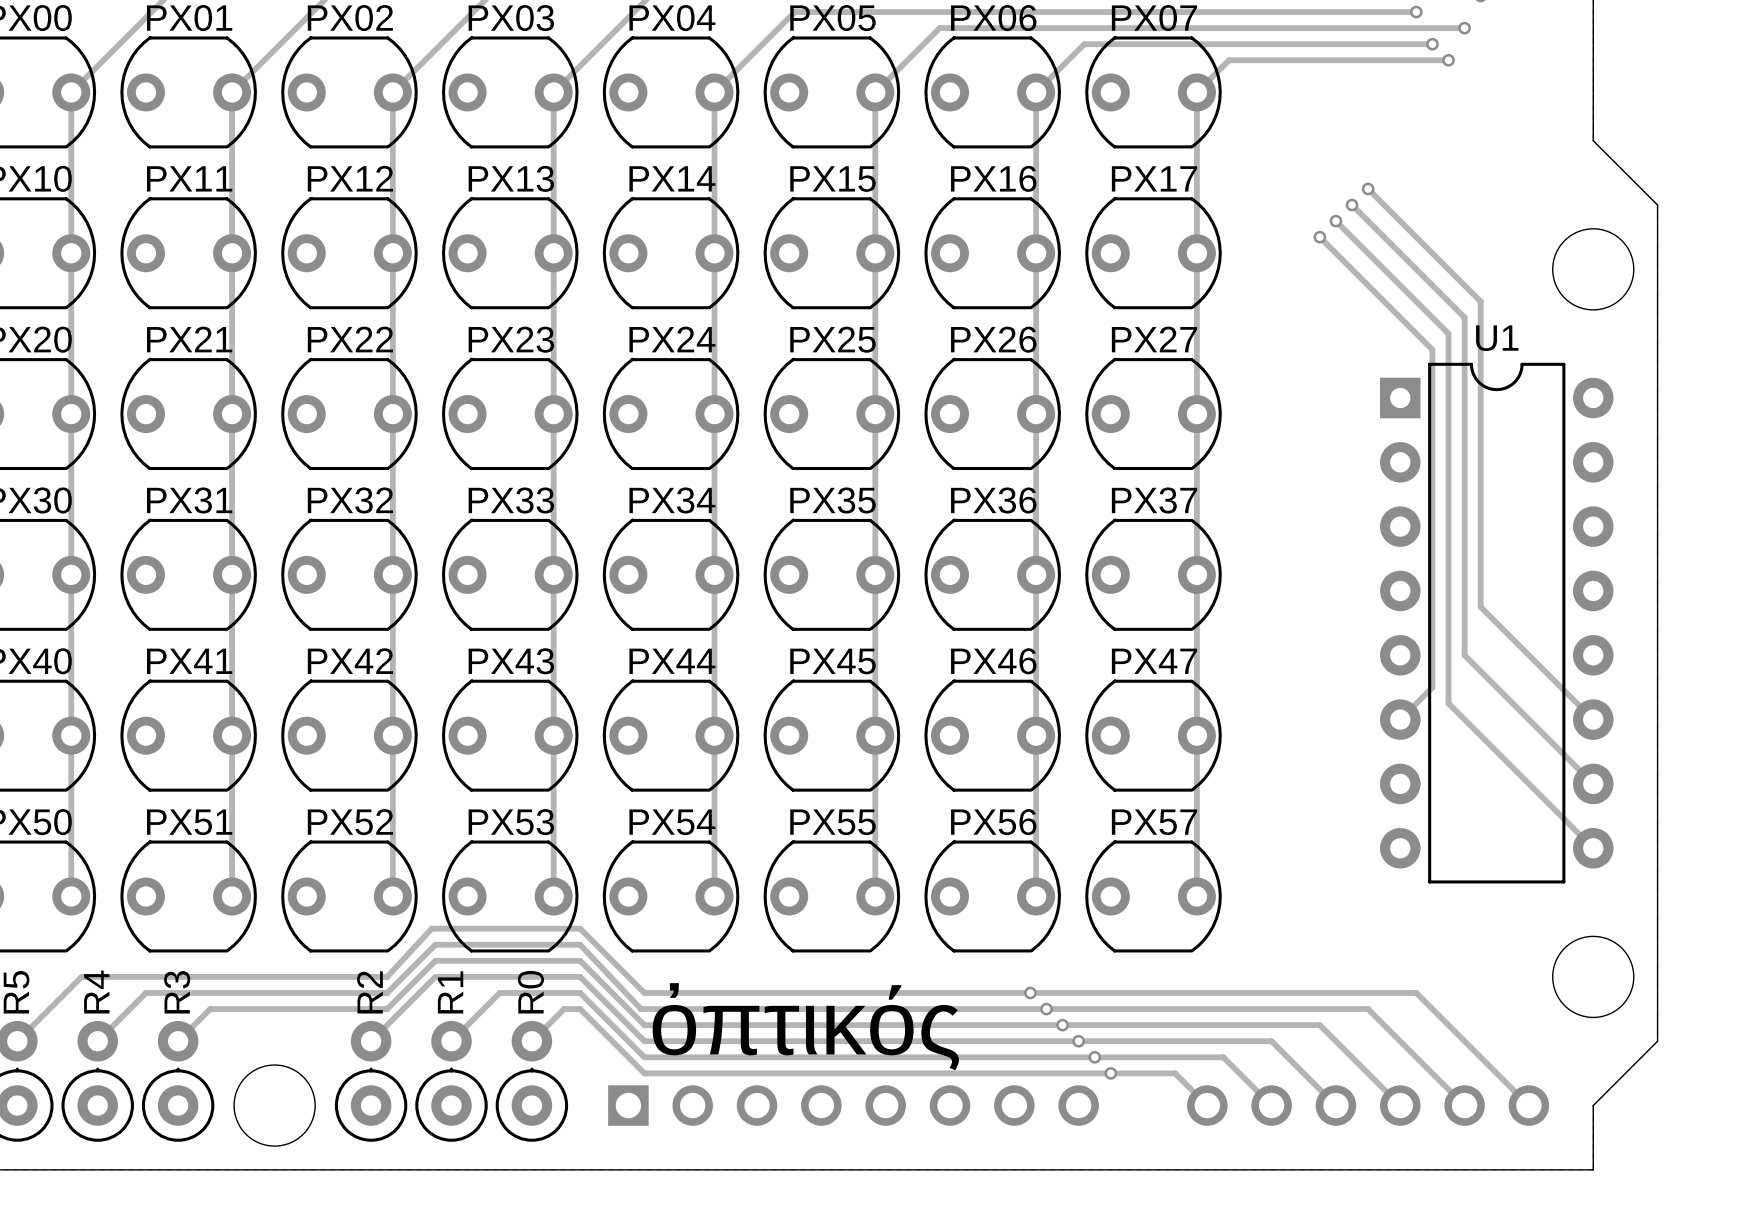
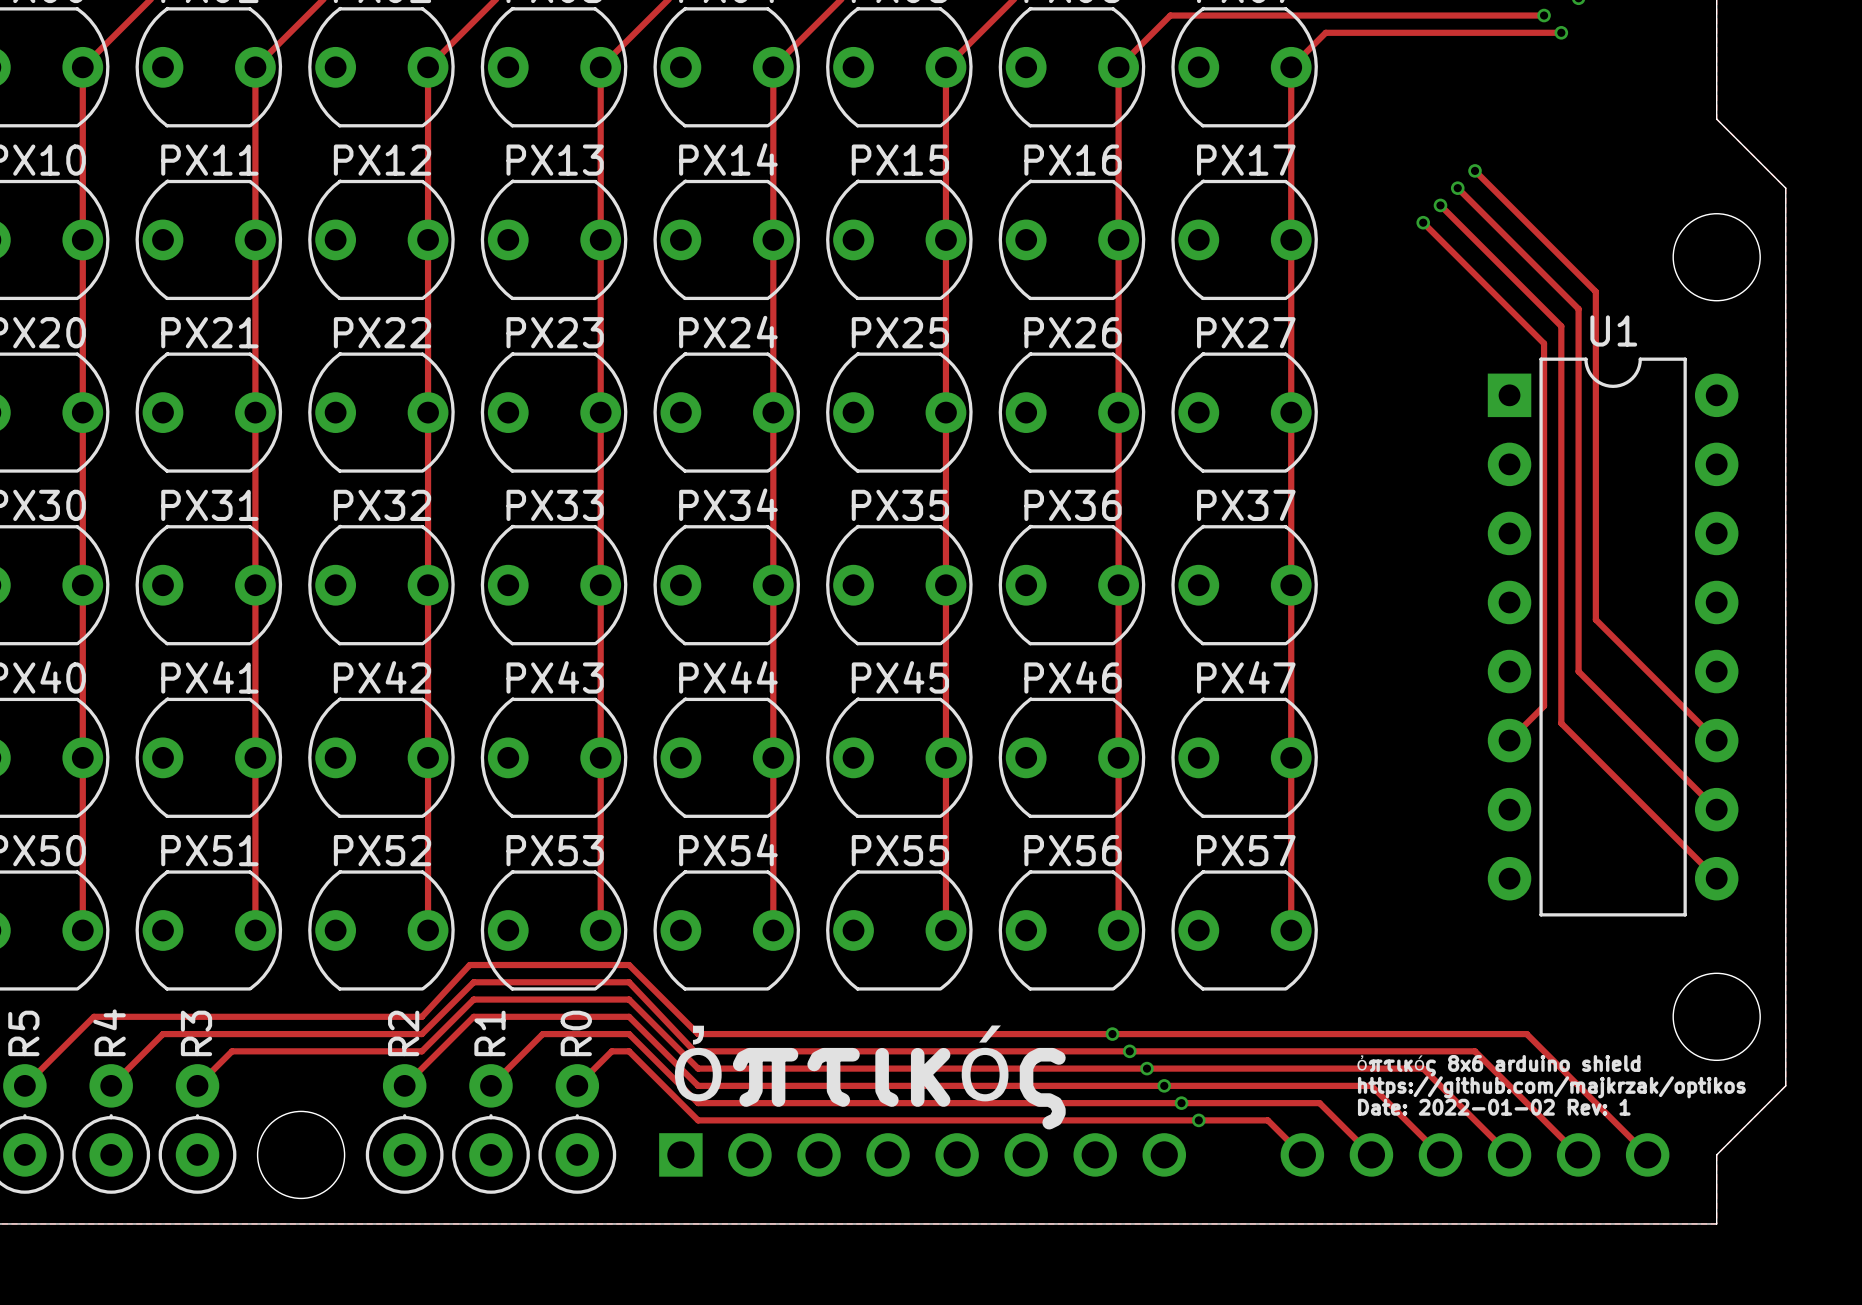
text: none -> ὀπτικός 8x6 arduino shield (1498, 1065)
text: none -> https://github.com/majkrzak/optikos (1551, 1087)
text: none -> Date: 2022-01-02 Rev: 1 (1494, 1107)

